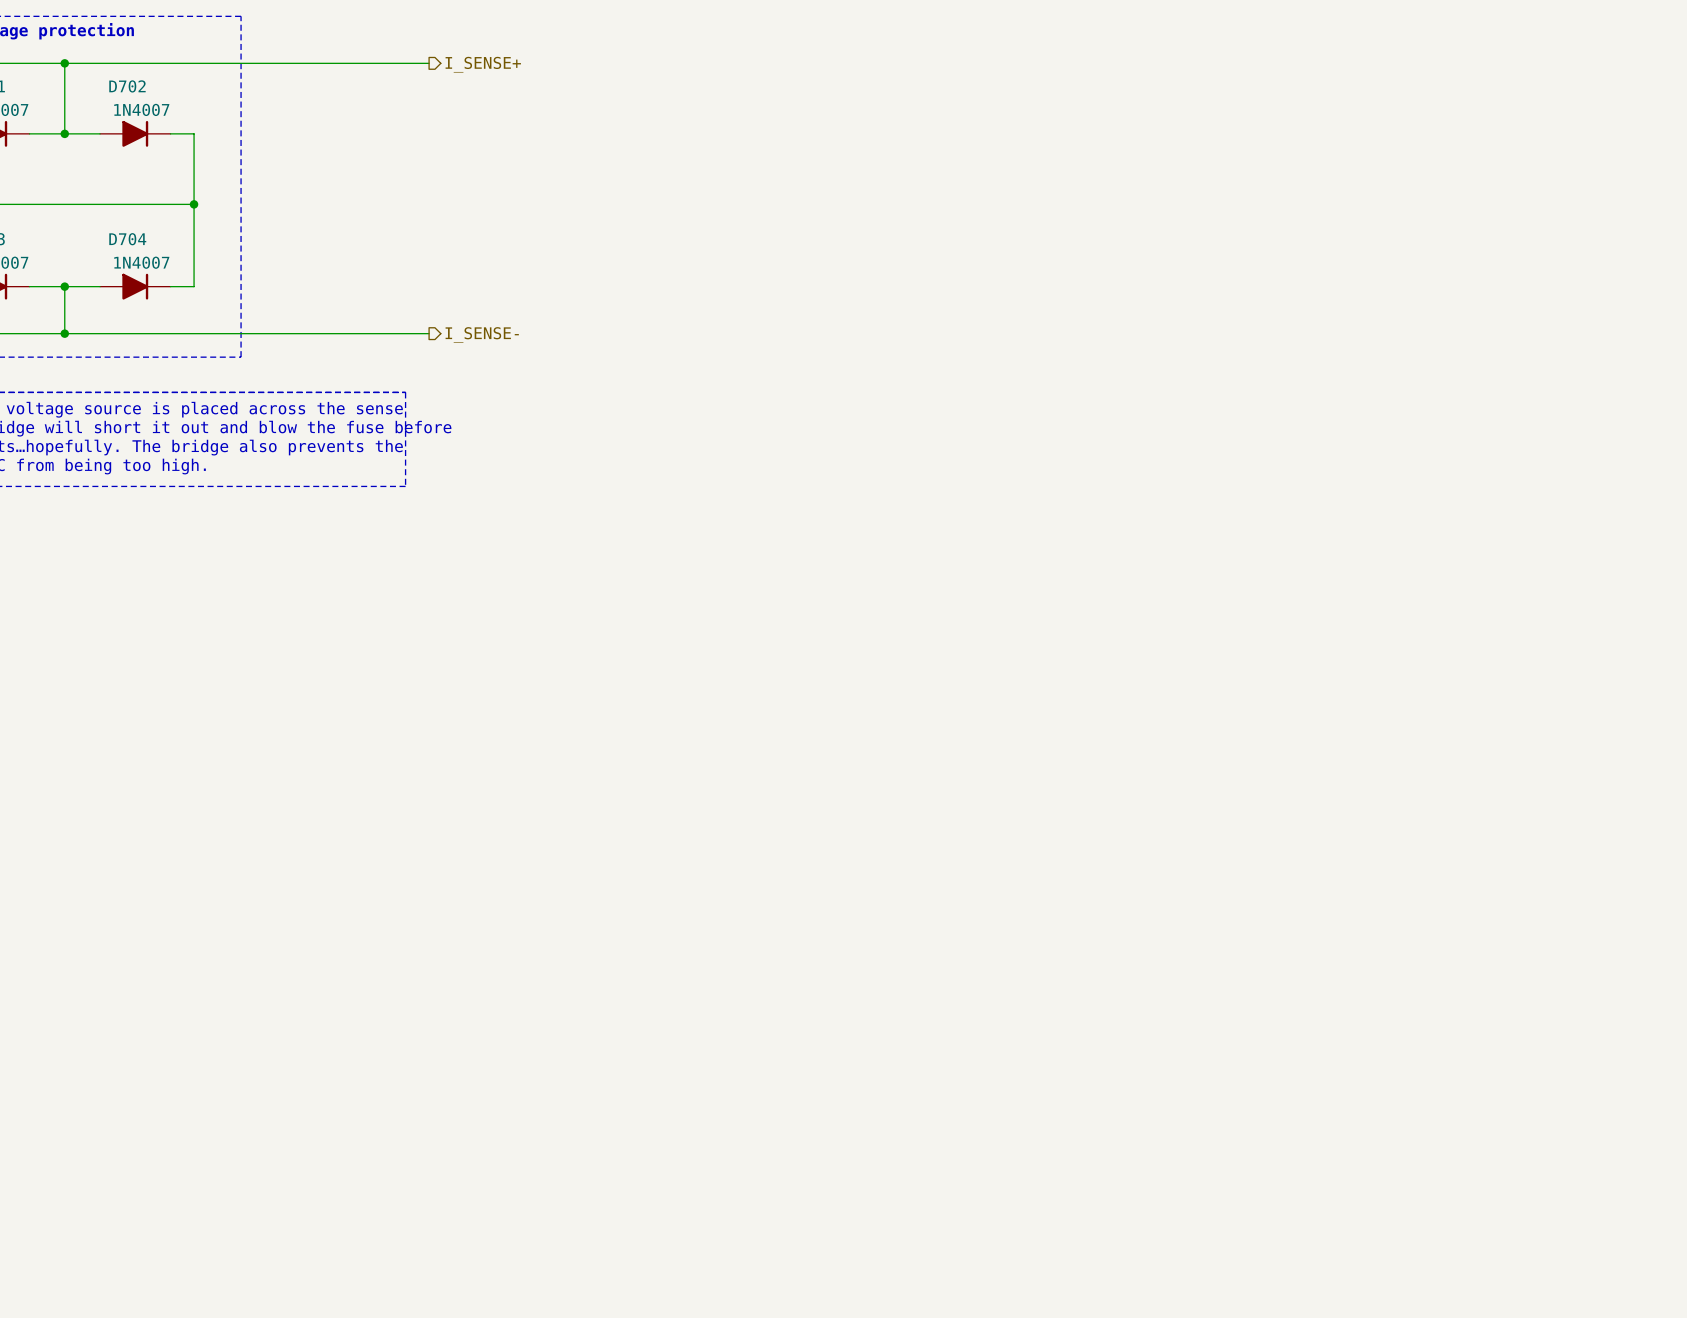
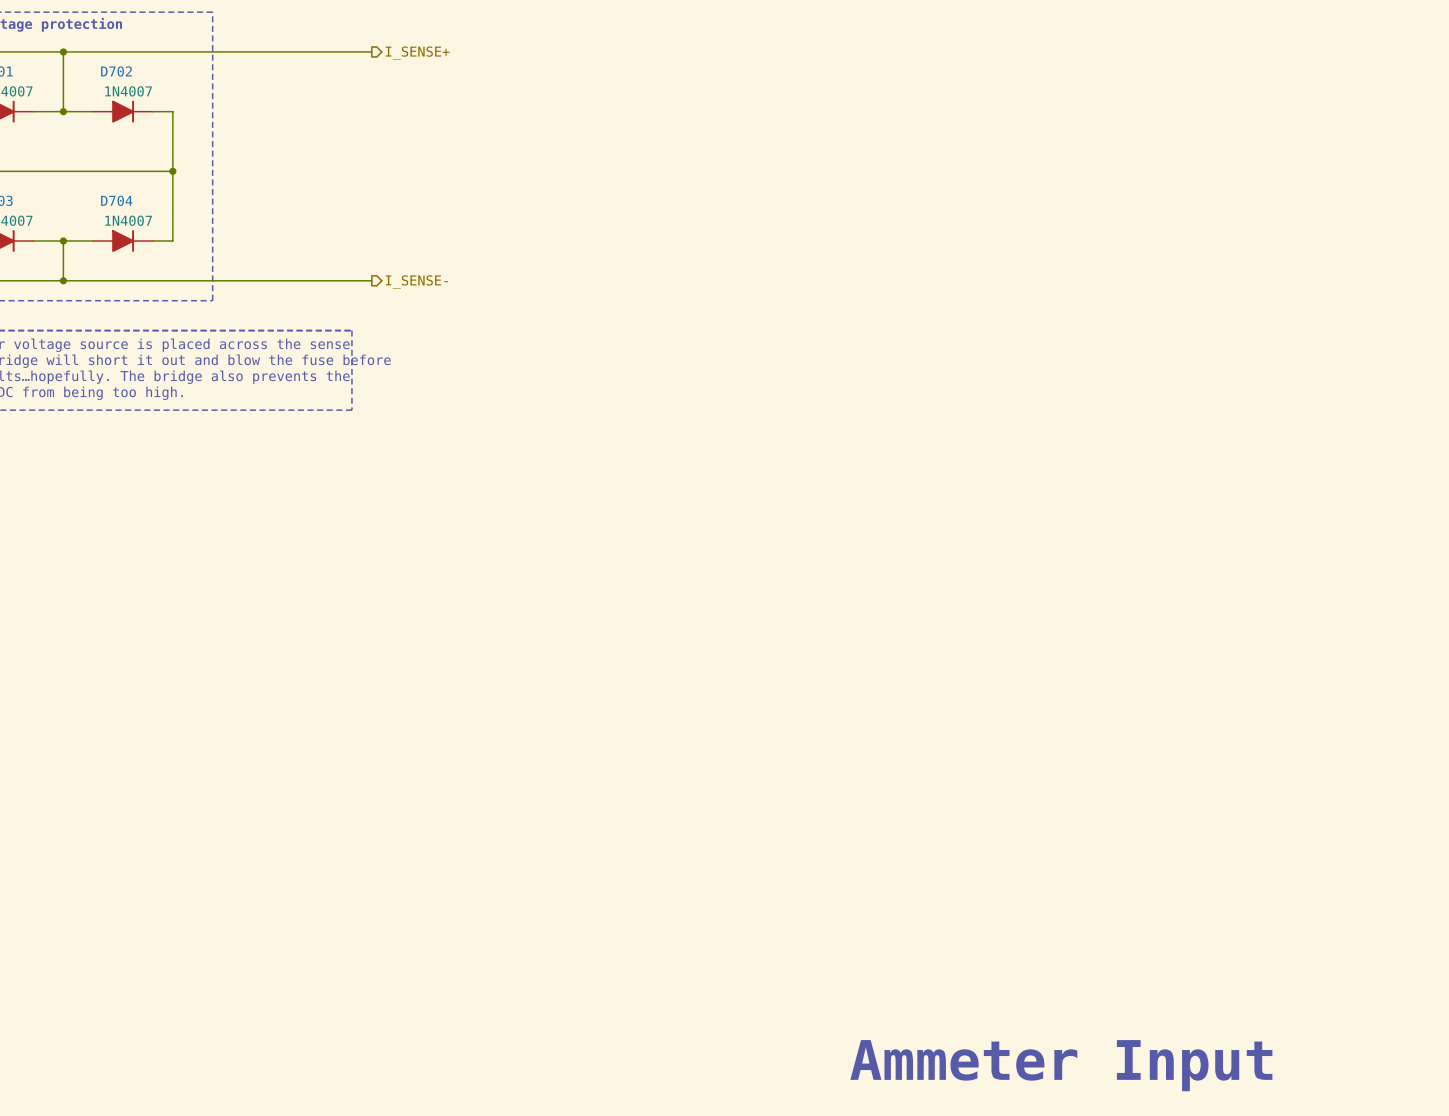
text: none -> Ammeter Input (1061, 1065)

